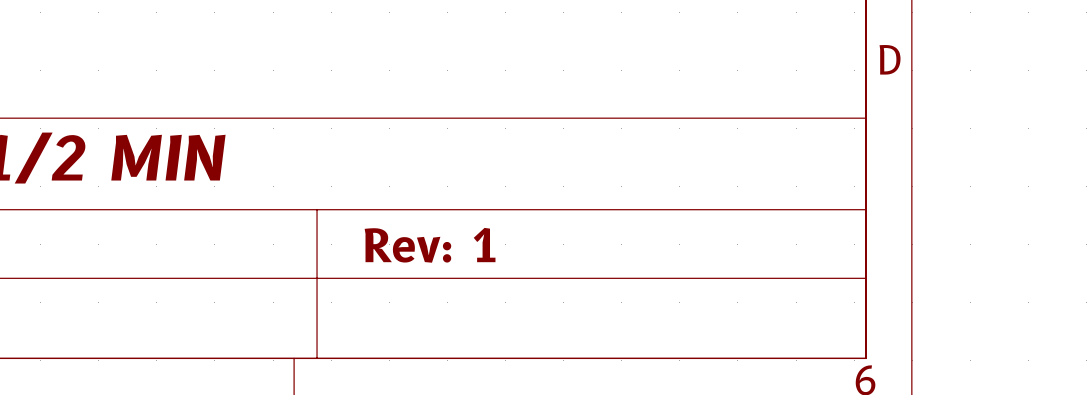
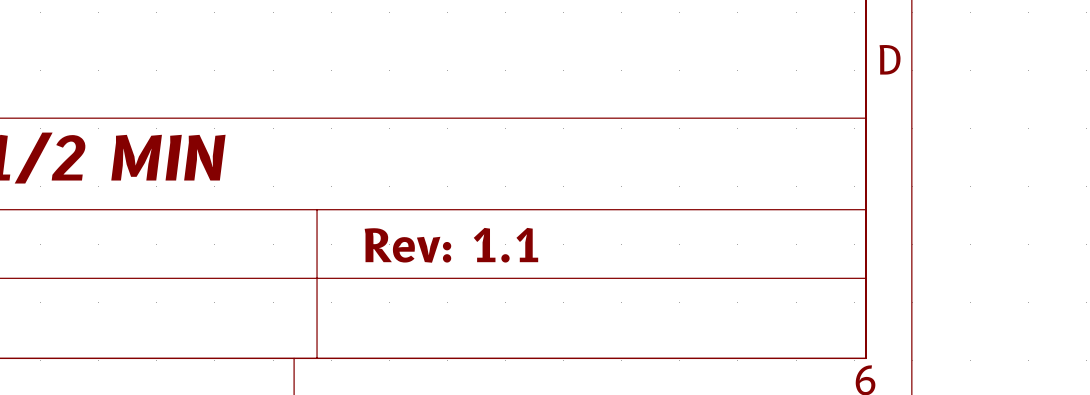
title block: Rev: 1 (430, 245) -> Rev: 1.1 (451, 245)

